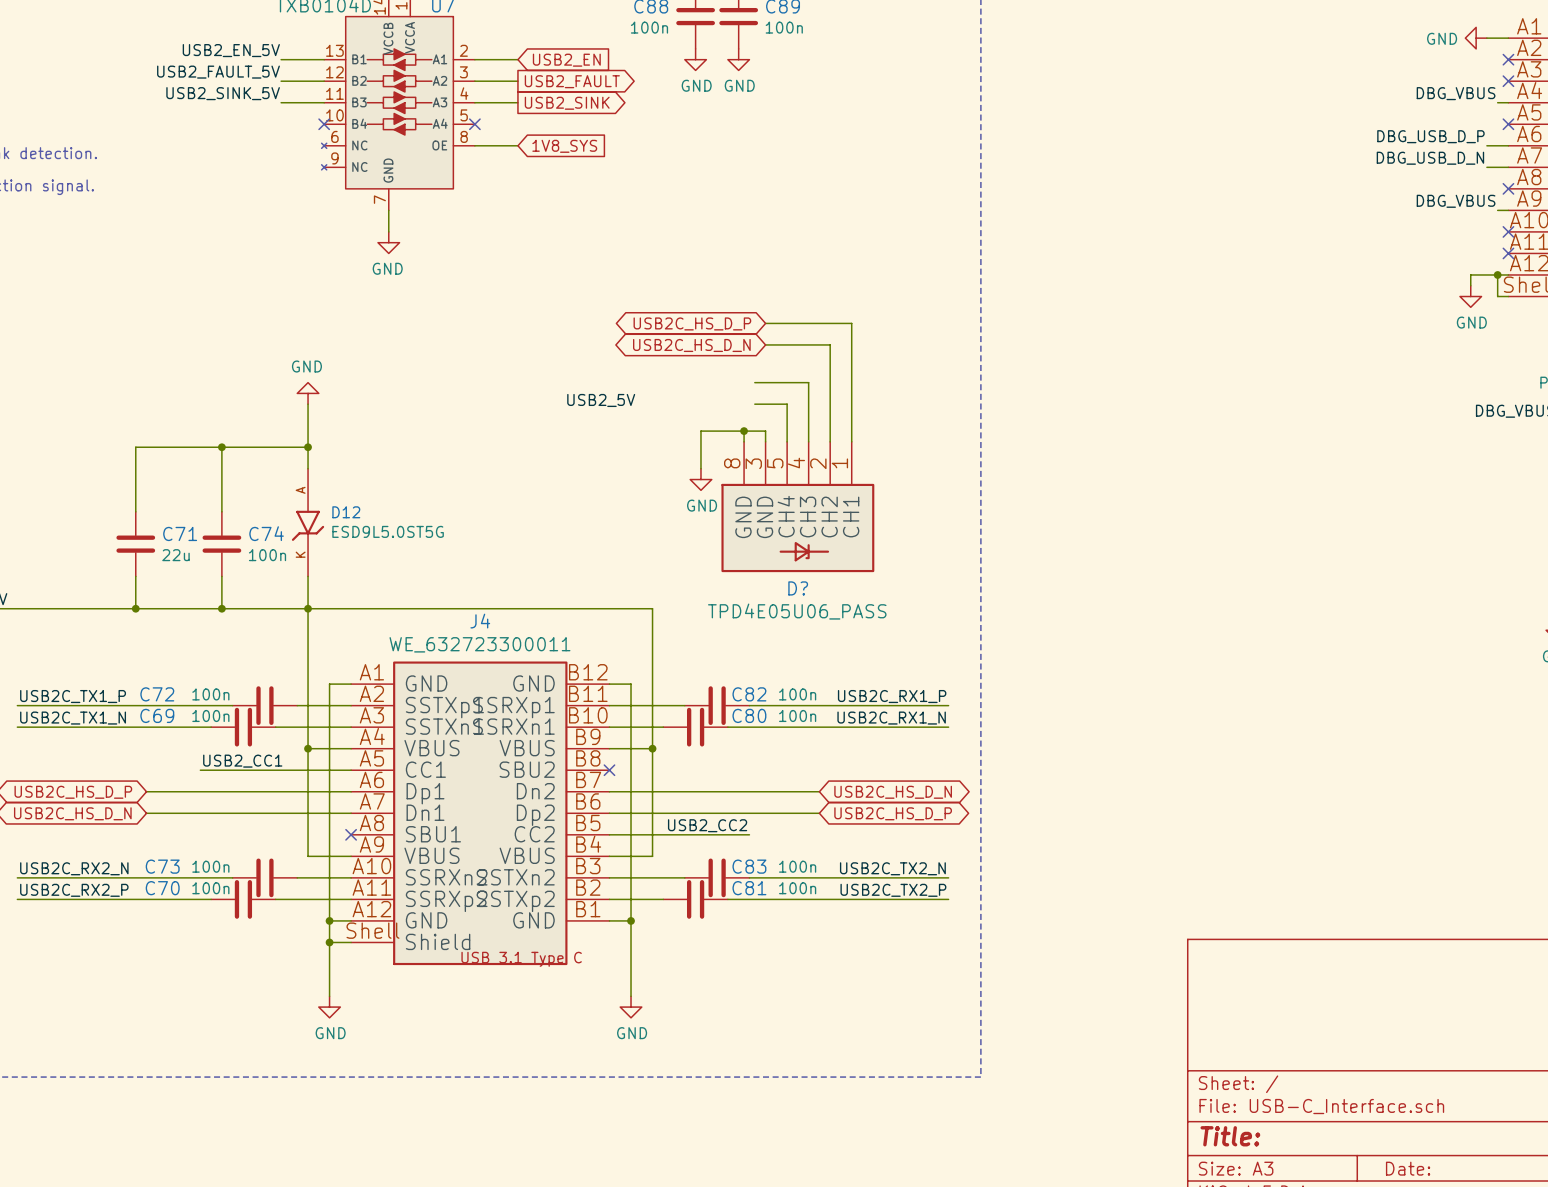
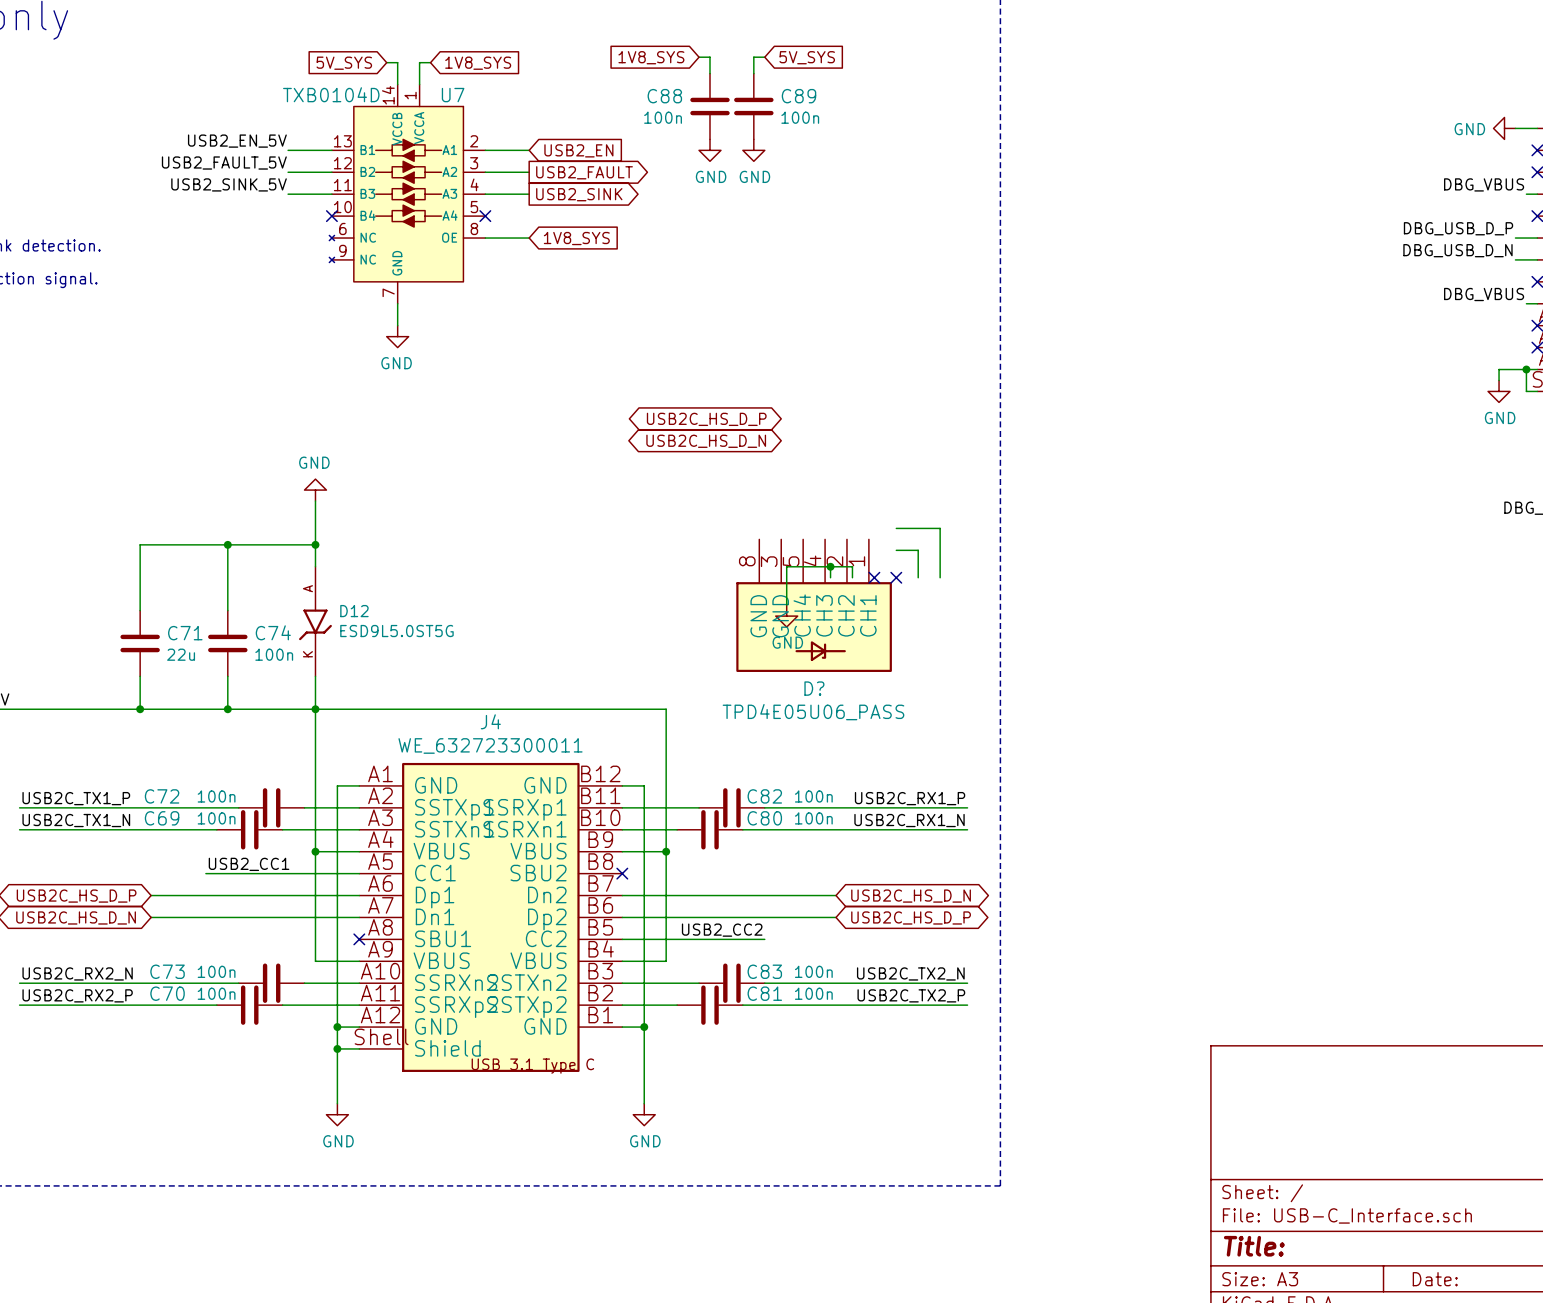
wire: (765, 323) (851, 323) (851, 441) -> none
wire: (765, 344) (830, 344) (830, 441) -> none
wire: (754, 382) (808, 382) (808, 441) -> none
label: USB2_5V (601, 400) -> none
wire: (754, 404) (787, 404) (787, 441) -> none
wire: (744, 431) (744, 441) -> (830, 566) (830, 577)
junction: (744, 431) -> none
wire: none -> (896, 528) (940, 528) (940, 577)
wire: (765, 441) (765, 431) (700, 431) (700, 468) -> (852, 577) (852, 566) (786, 566) (786, 605)
wire: none -> (896, 550) (918, 550) (918, 577)
junction: none -> (830, 566)
power symbol position: GND (700, 479) -> GND (786, 616)
no-connect mark: none -> (874, 577)
no-connect mark: none -> (896, 577)

